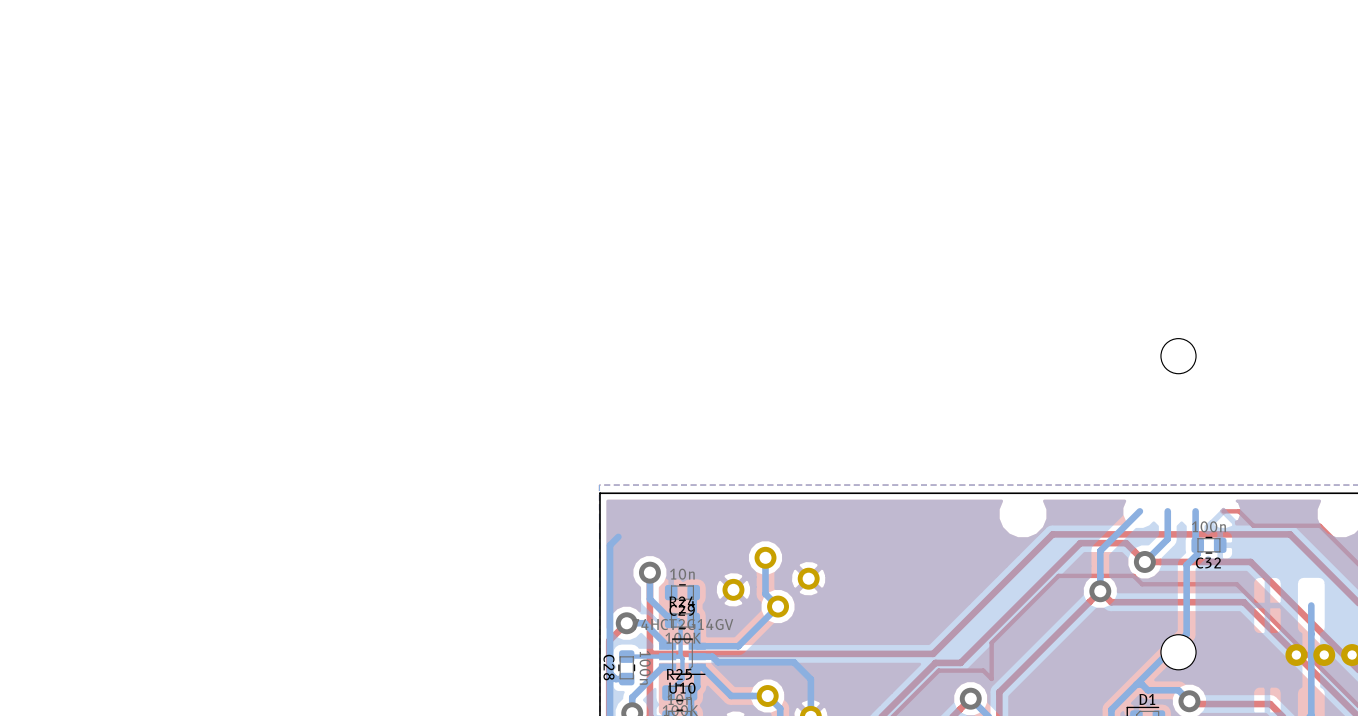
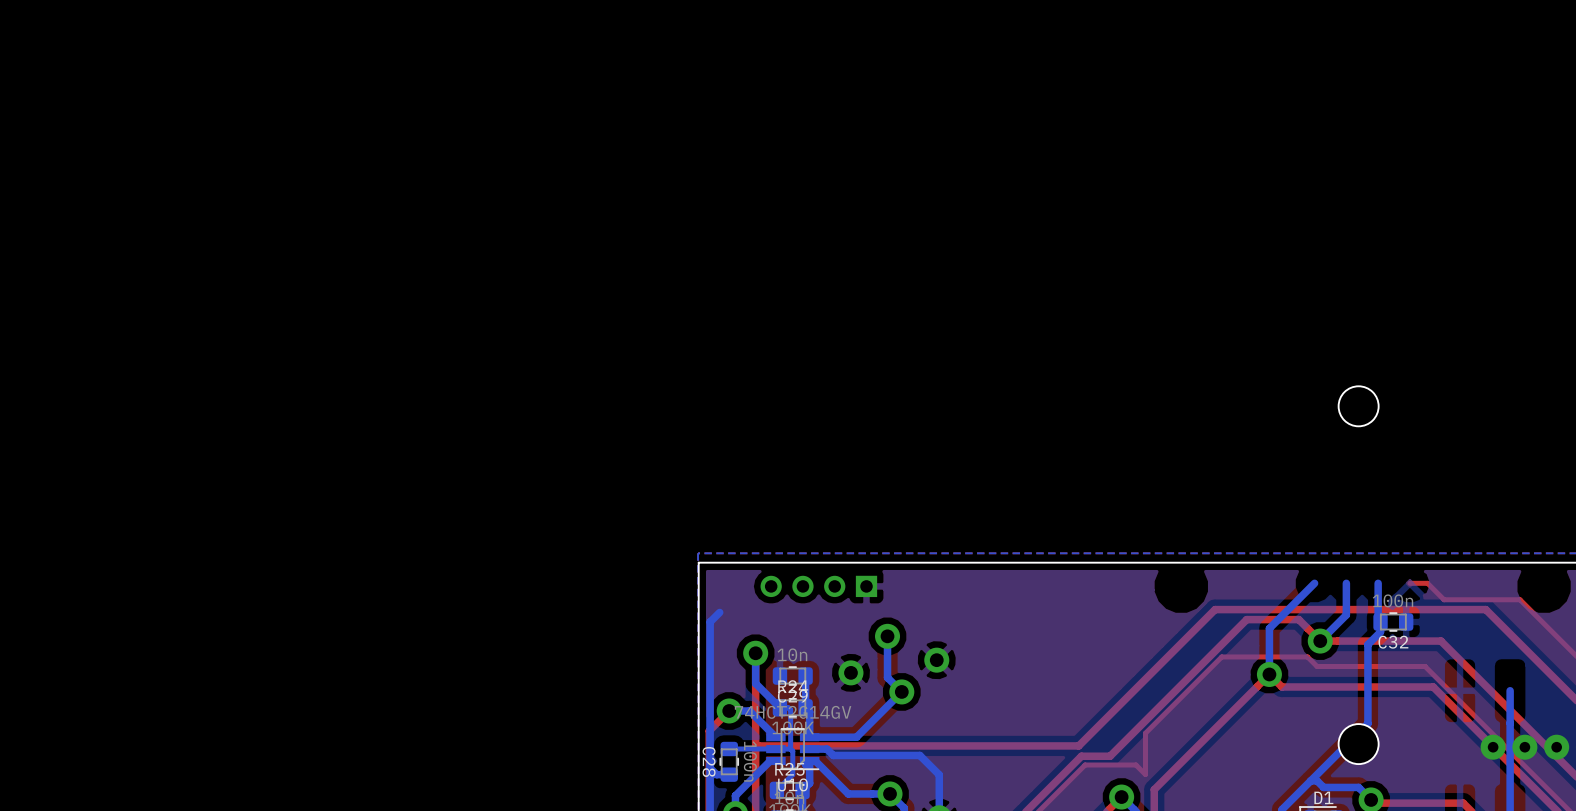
part: none -> (818, 586)

